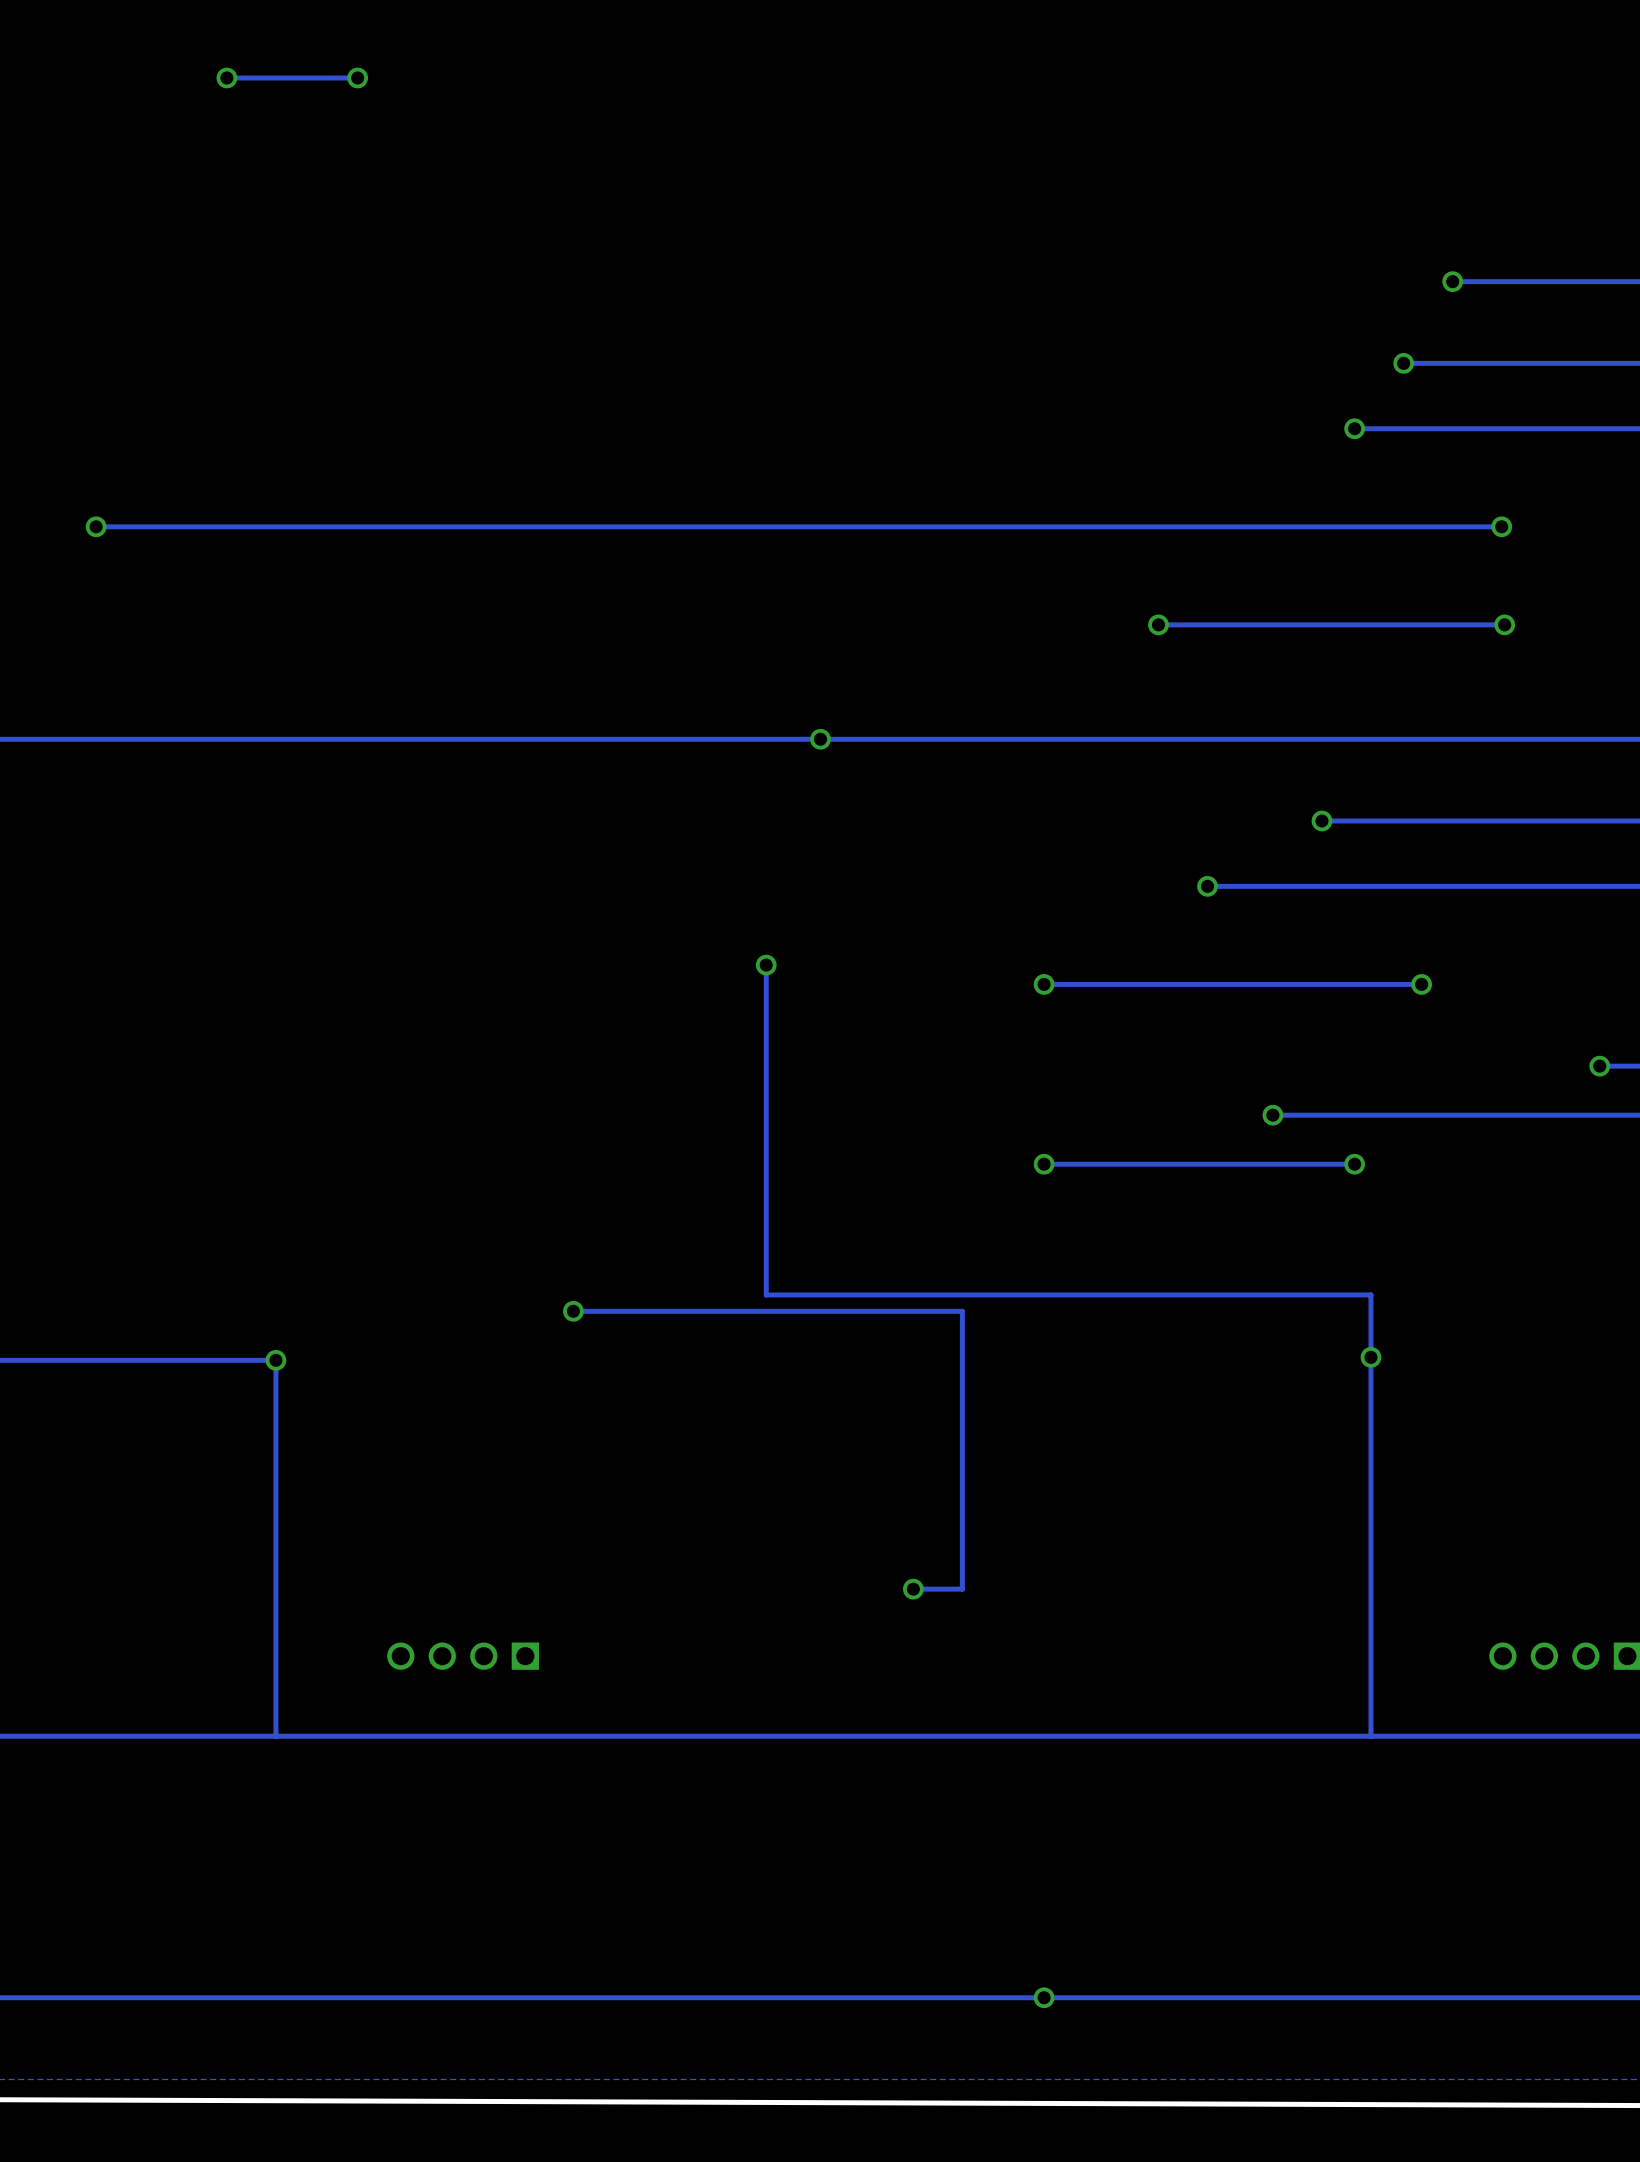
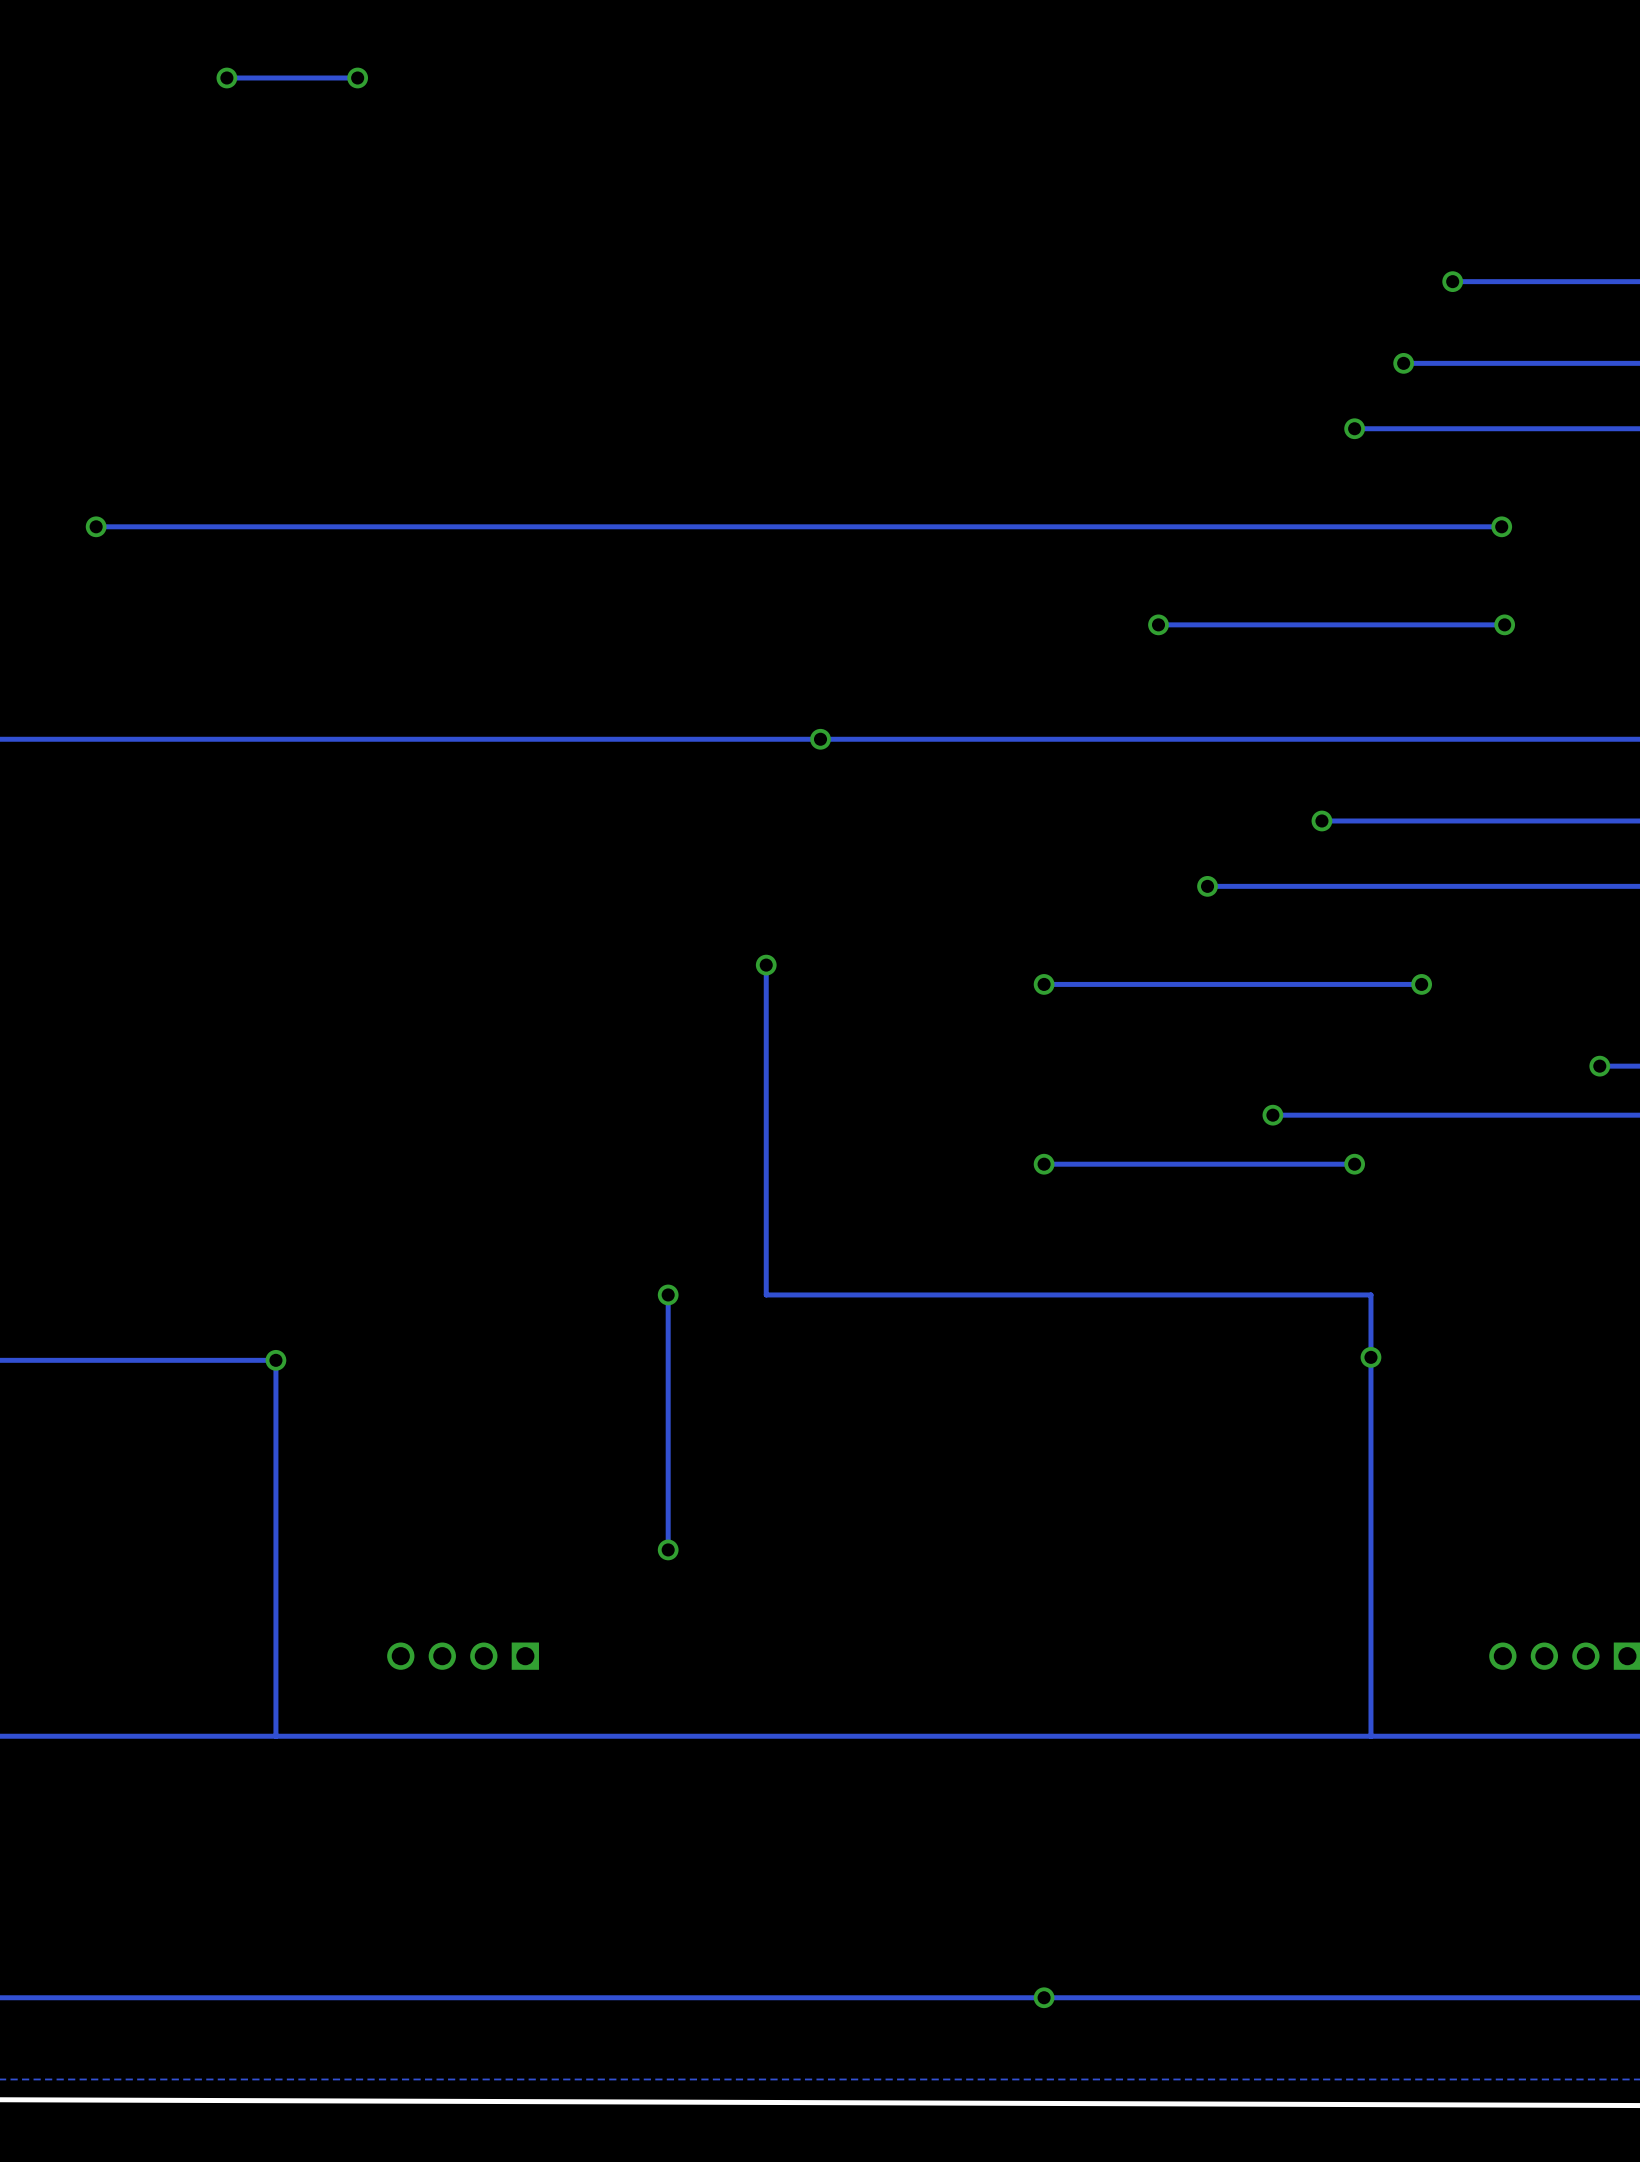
track: none -> (668, 1294) (668, 1549)
track: (573, 1311) (962, 1311) (962, 1589) (913, 1589) -> none
via position: (573, 1311) -> (668, 1294)
via: none -> (668, 1549)
via: (913, 1589) -> none

